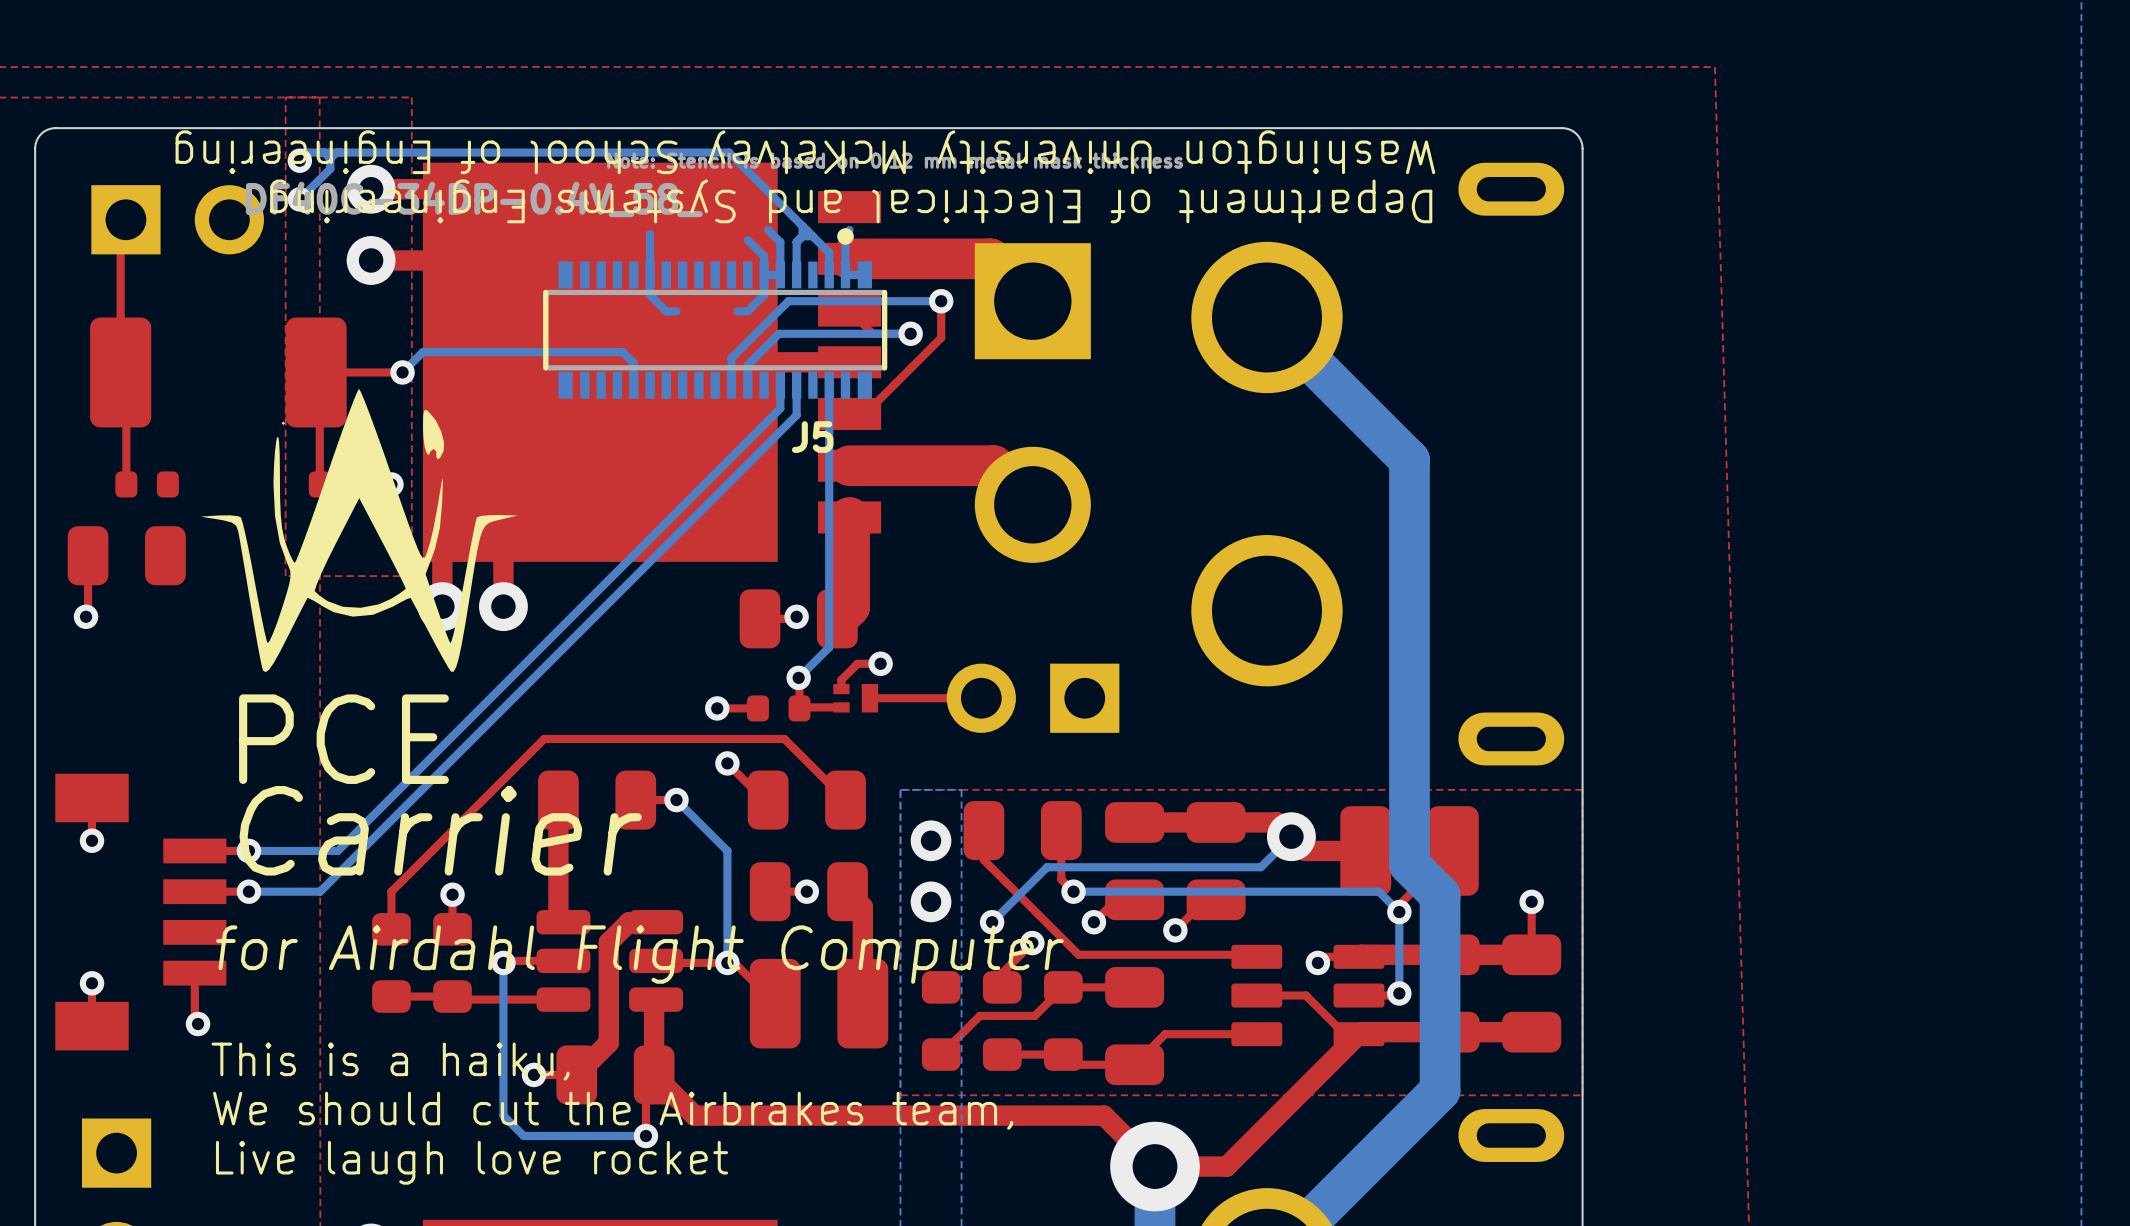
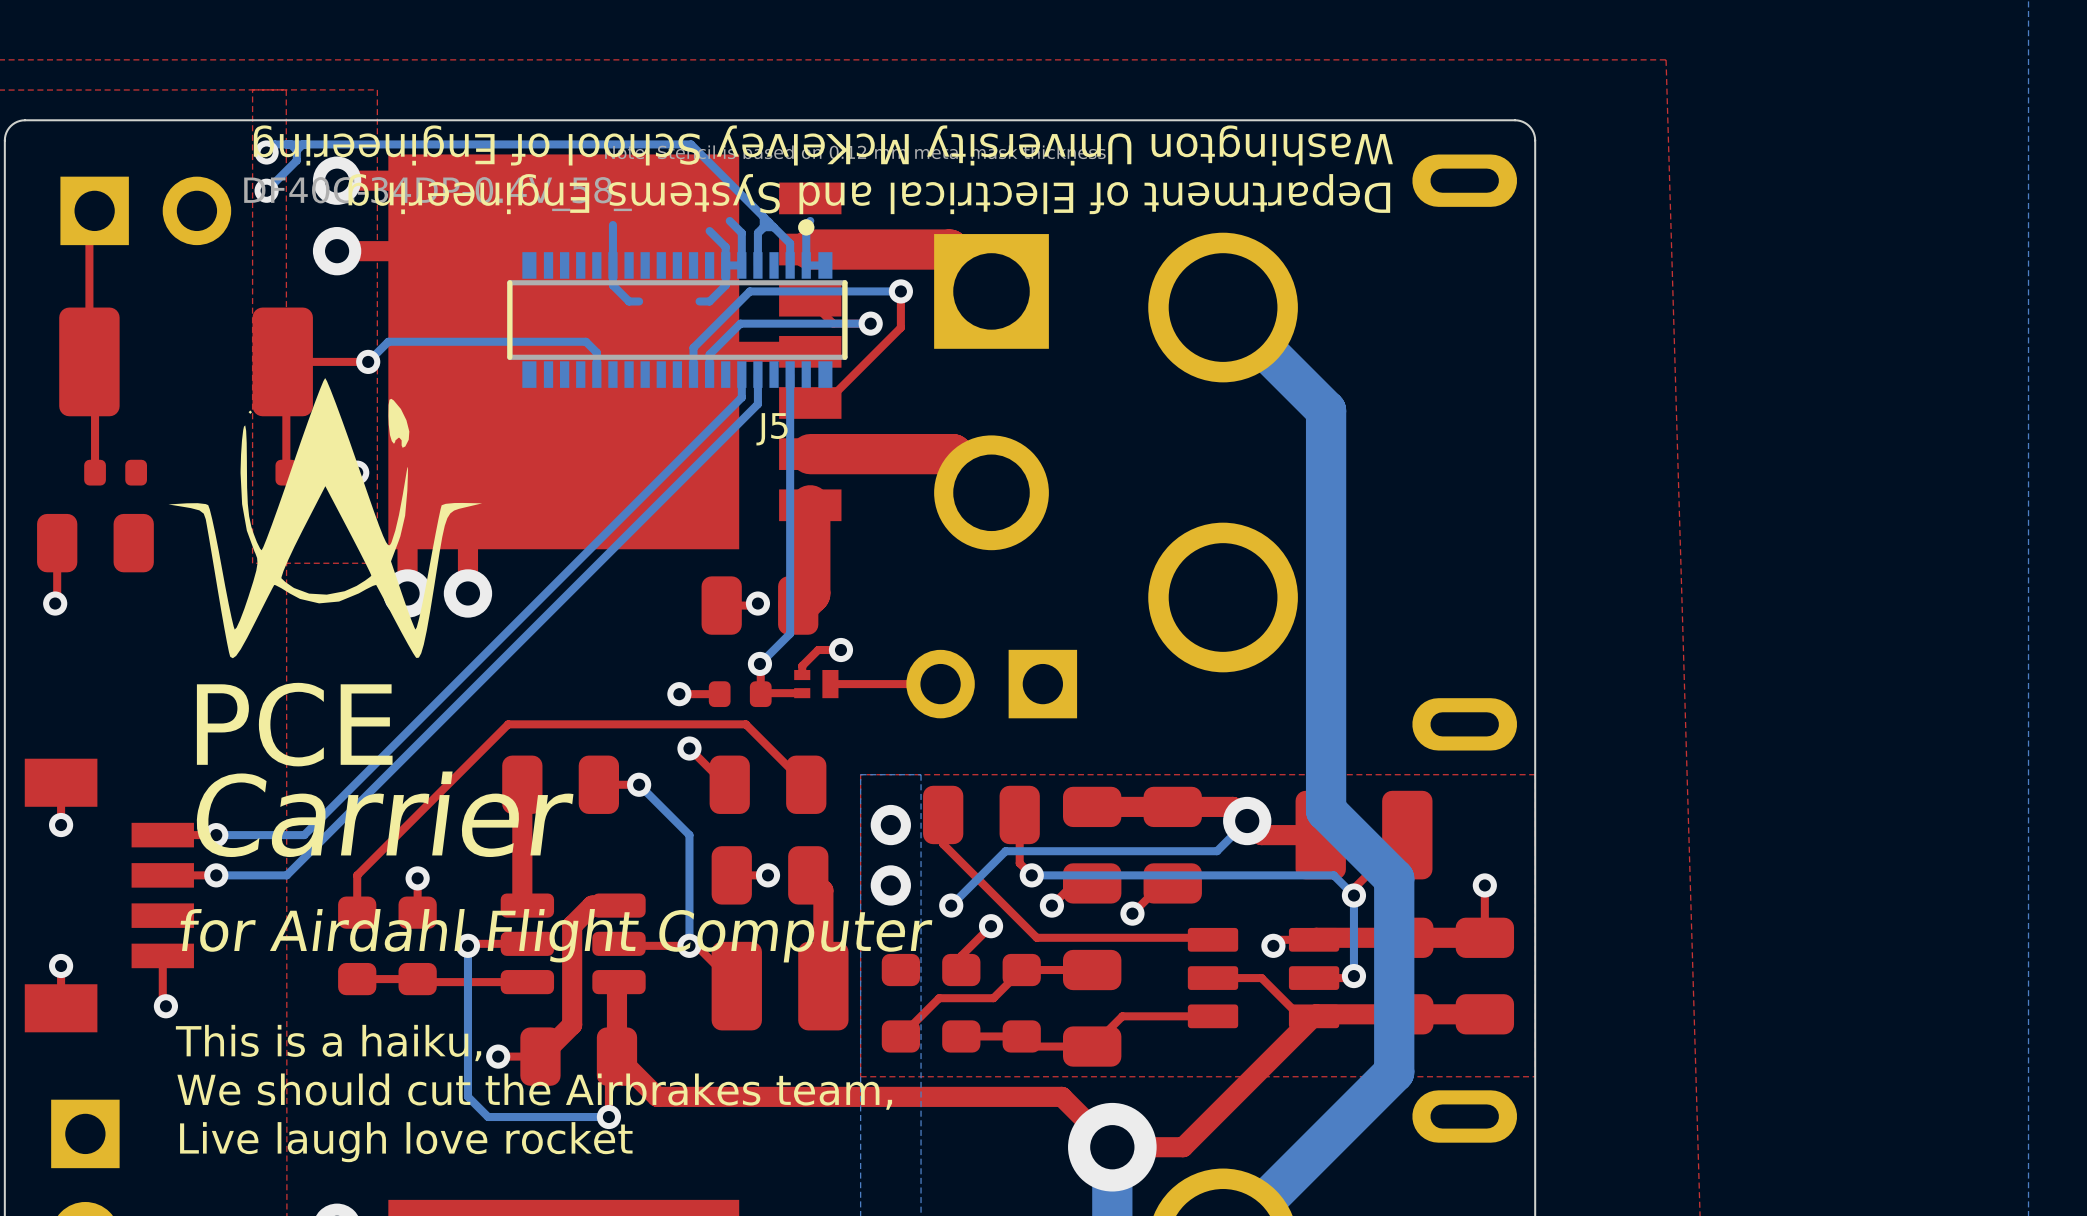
bottom track: (1371, 421) (1409, 460) (1409, 864) -> (1326, 410) (1326, 810) (1364, 848)

